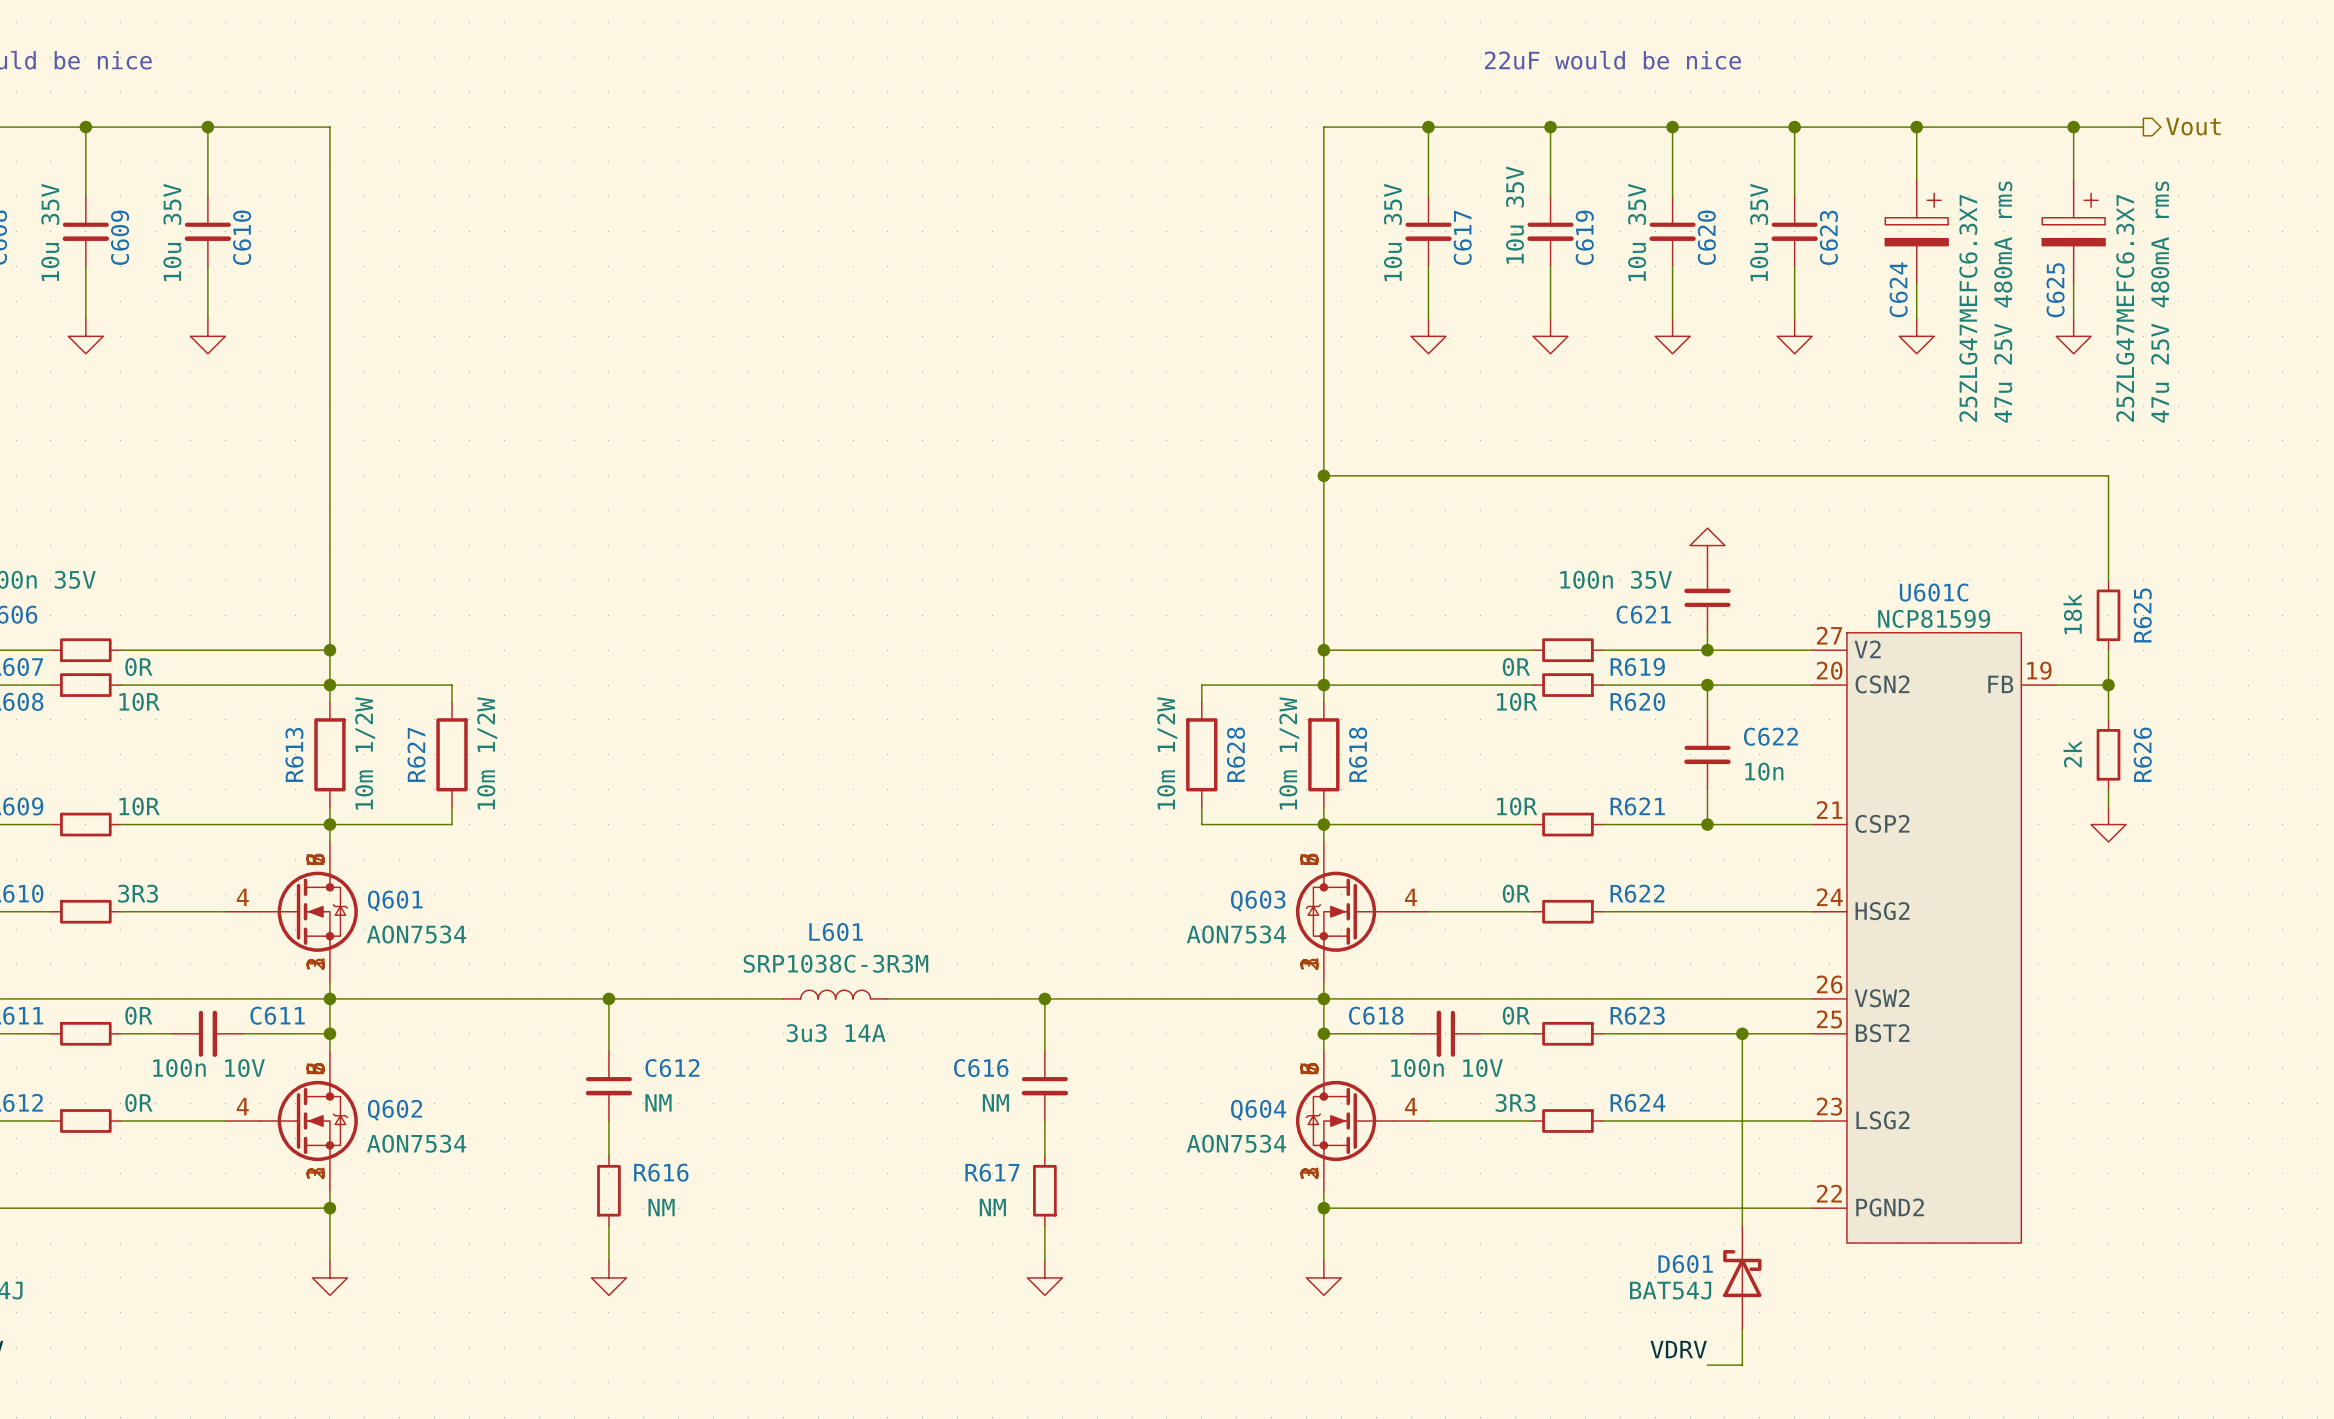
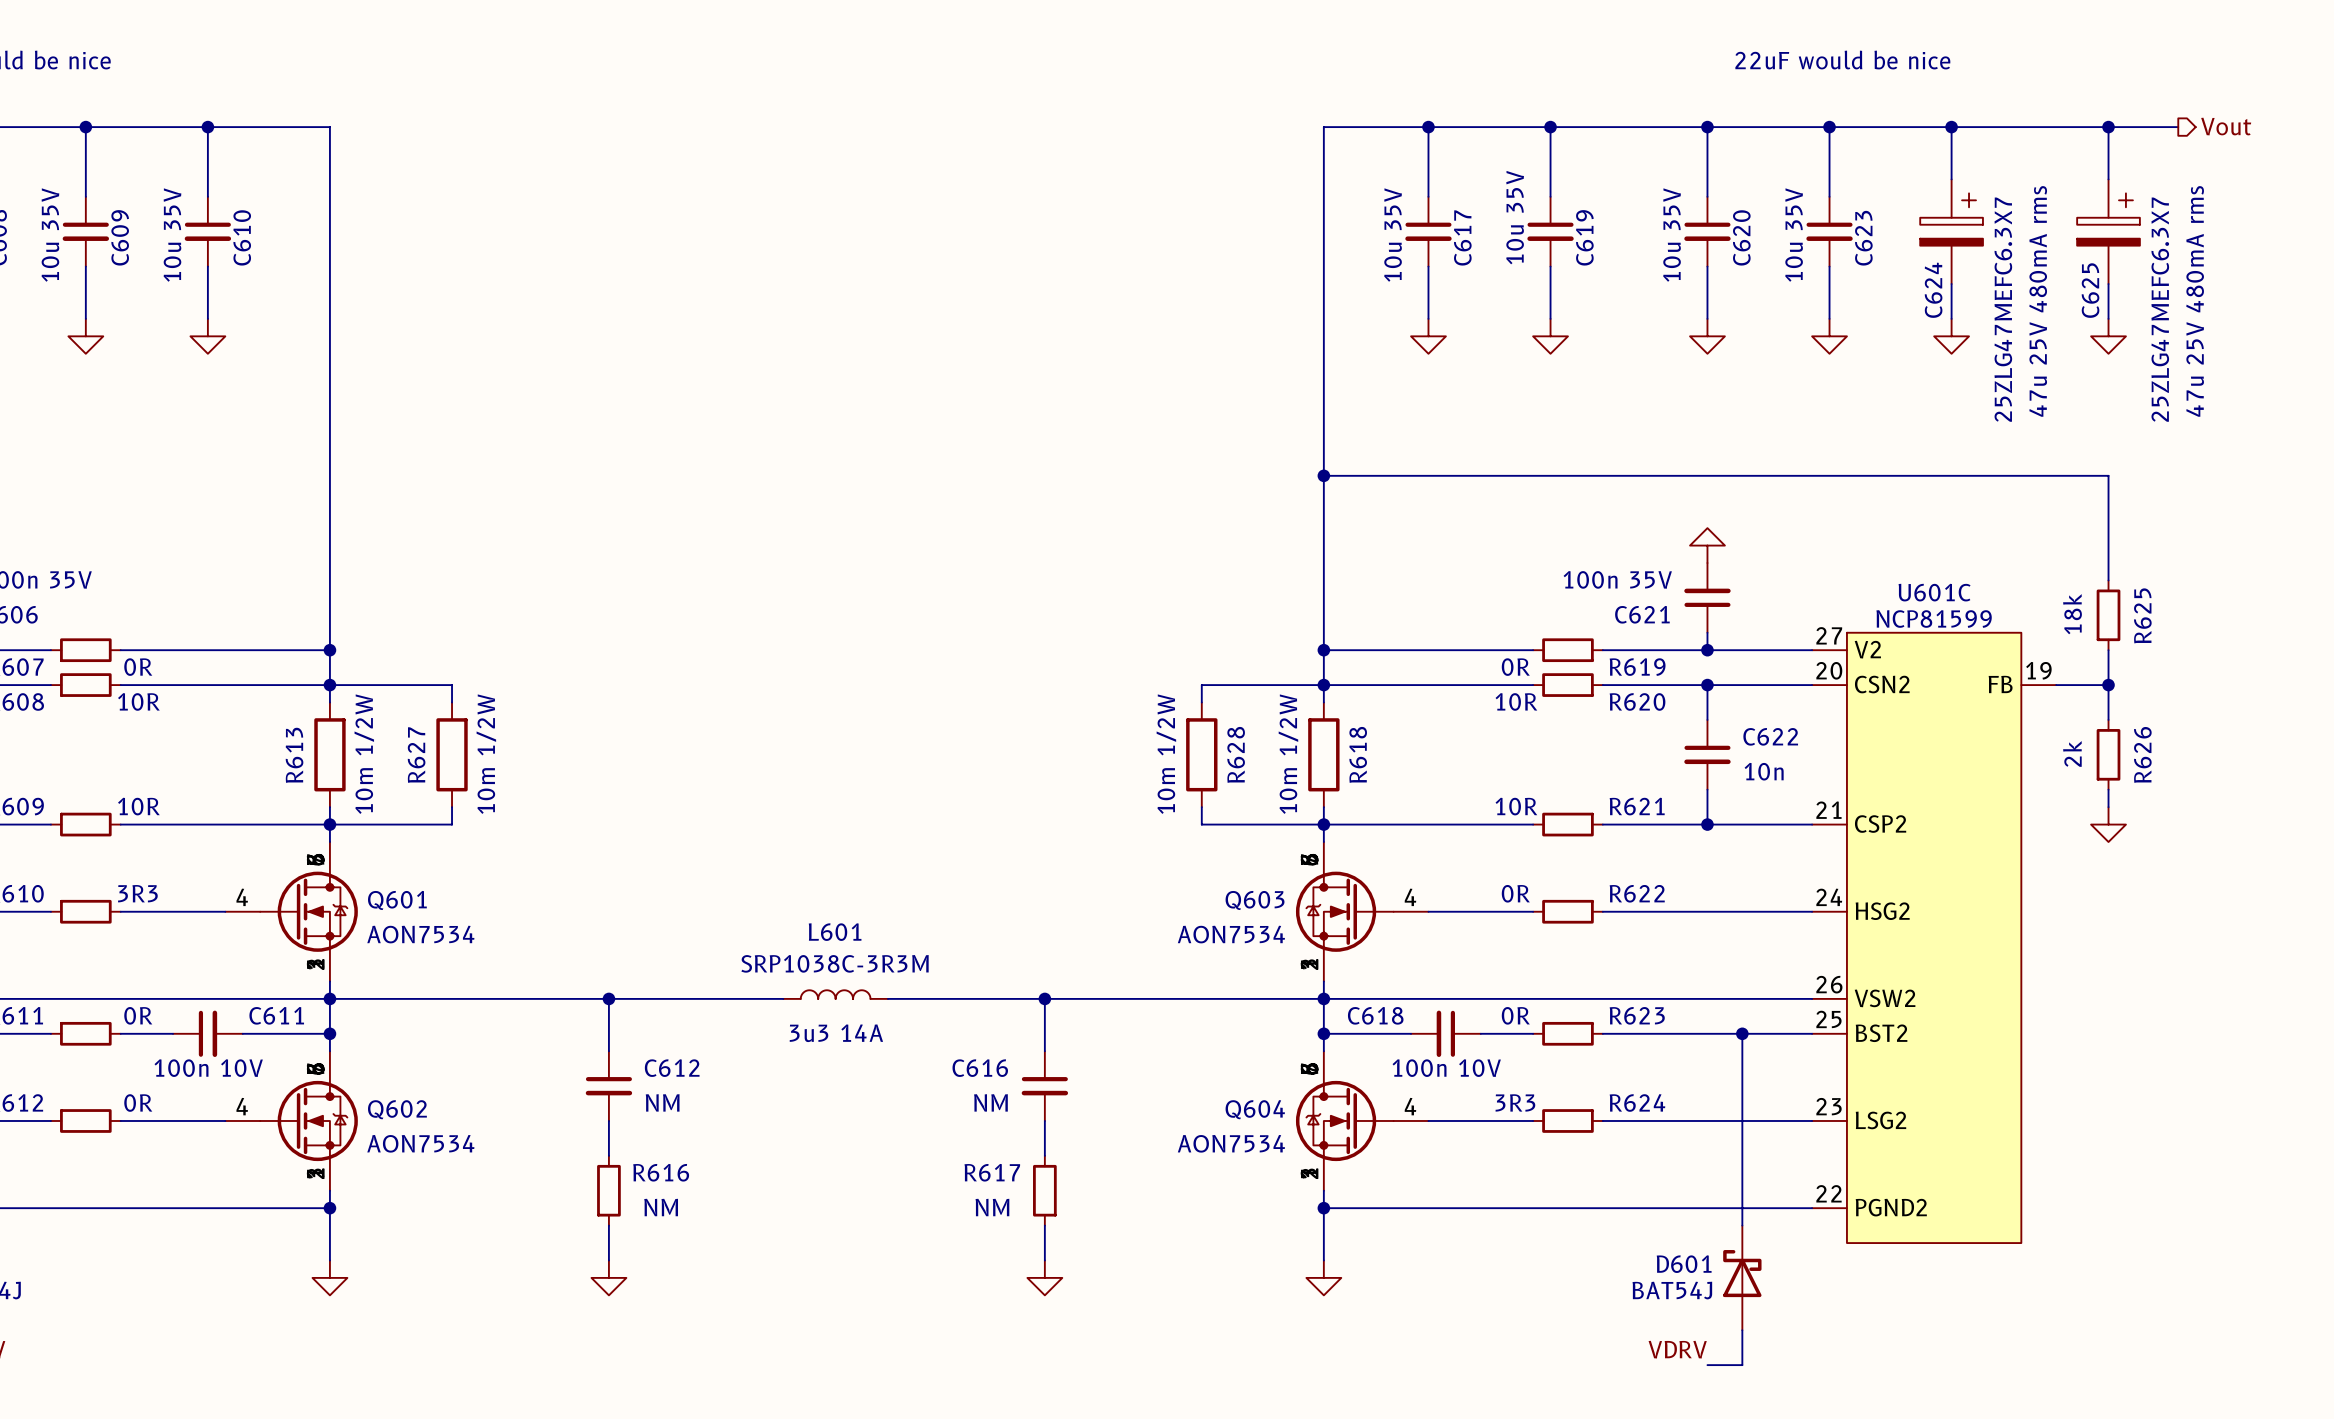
text position: 22uF would be nice (1612, 60) -> 22uF would be nice (1842, 60)
hierarchical label position: Vout (2193, 126) -> Vout (2226, 126)
wire: (1672, 127) (1672, 196) -> (1707, 127) (1707, 196)
junction position: (1672, 127) -> (1707, 127)
wire: (1794, 127) (1794, 196) -> (1829, 127) (1829, 196)
junction position: (1794, 127) -> (1829, 127)
wire: (1916, 127) (1916, 179) -> (1951, 127) (1951, 179)
junction position: (1916, 127) -> (1951, 127)
wire: (2073, 127) (2073, 179) -> (2108, 127) (2108, 179)
junction position: (2073, 127) -> (2108, 127)
wire: none -> (2143, 127) (2178, 127)
C620 position: (1672, 231) -> (1707, 231)
C623 position: (1794, 231) -> (1829, 231)
C624 position: (1916, 231) -> (1951, 231)
C625 position: (2073, 231) -> (2108, 231)
wire: (1672, 266) (1672, 318) -> (1707, 266) (1707, 318)
wire: (1794, 266) (1794, 318) -> (1829, 266) (1829, 318)
wire: (1916, 284) (1916, 318) -> (1951, 284) (1951, 318)
wire: (2073, 284) (2073, 318) -> (2108, 284) (2108, 318)
power symbol position: (1672, 336) -> (1707, 336)
power symbol position: (1794, 336) -> (1829, 336)
power symbol position: (1916, 336) -> (1951, 336)
power symbol position: (2073, 336) -> (2108, 336)

